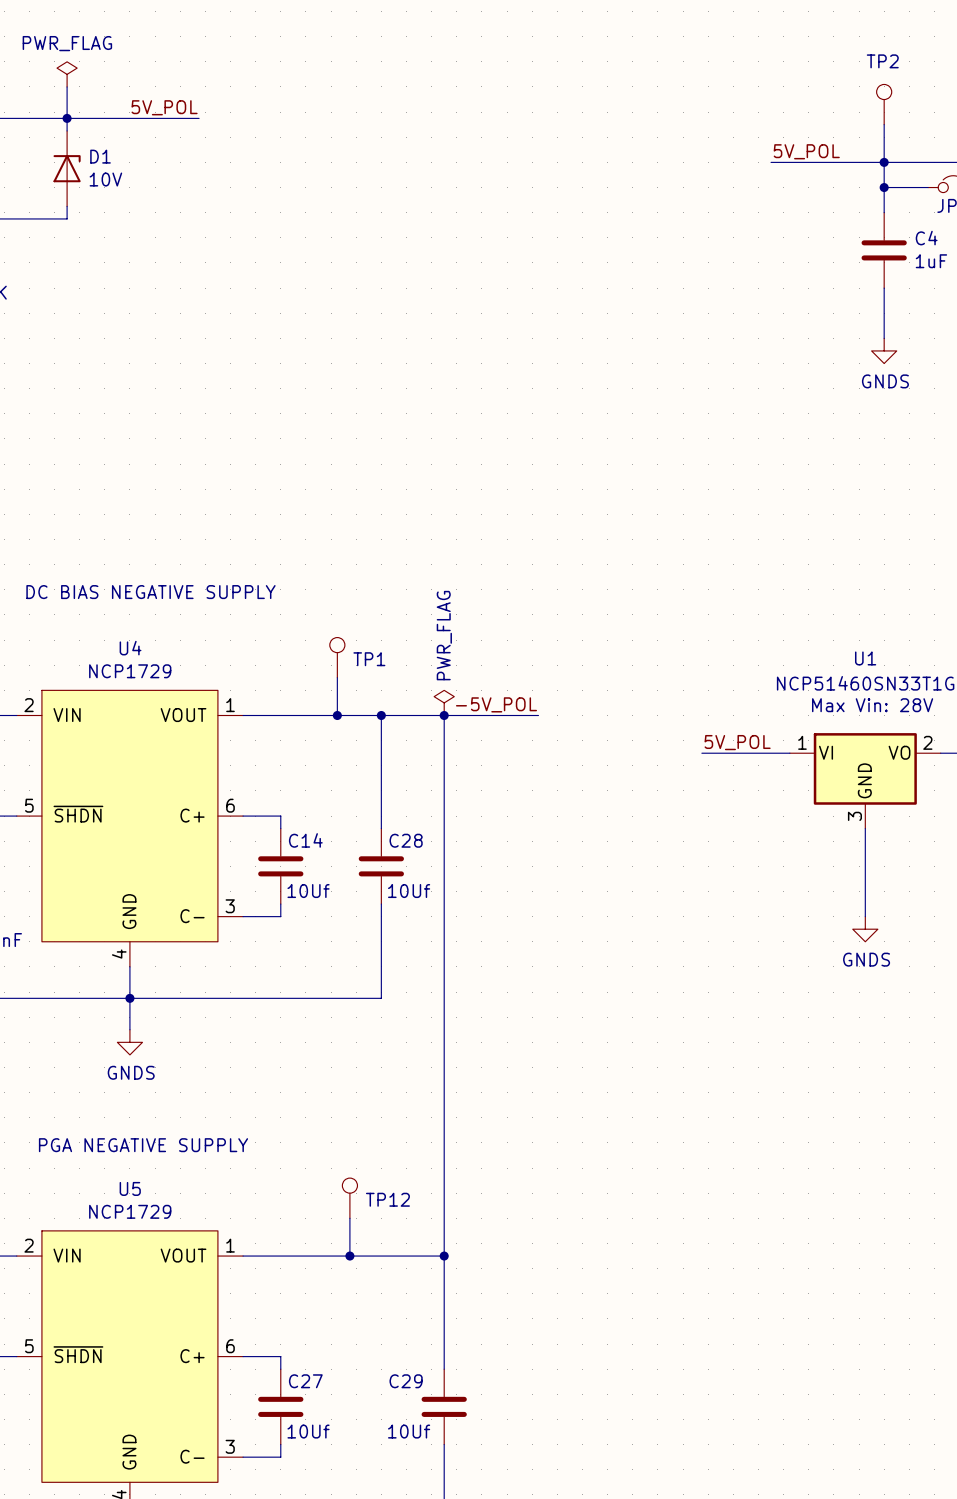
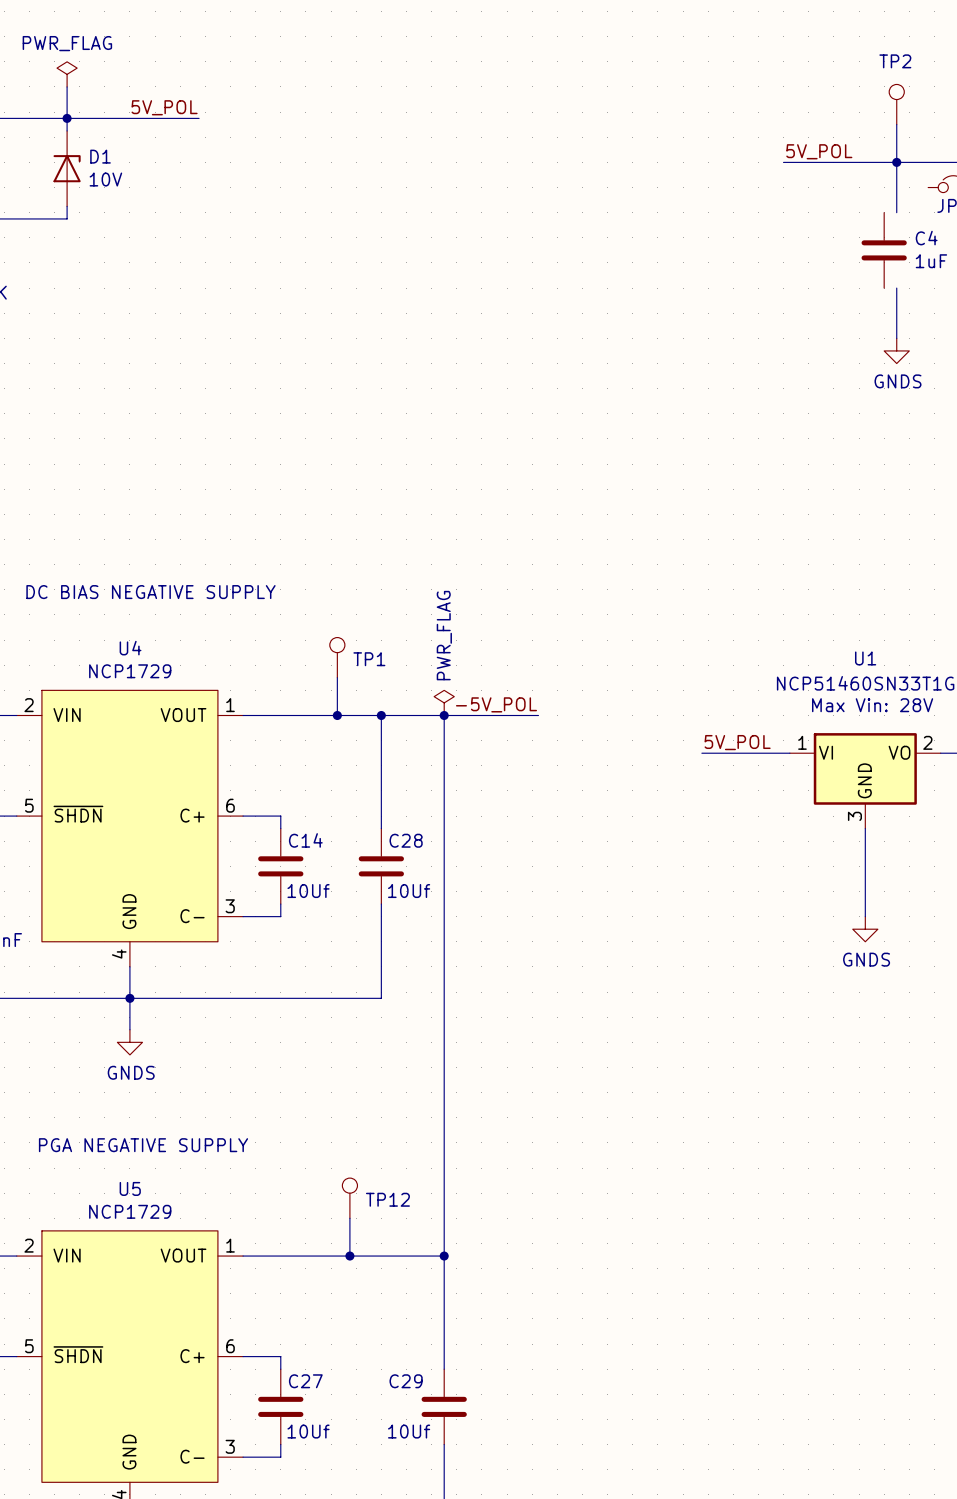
TP2 position: (884, 104) -> (896, 104)
wire: (884, 124) (884, 212) -> (896, 124) (896, 212)
label position: 5V_POL (806, 151) -> 5V_POL (819, 151)
wire: (771, 162) (783, 162) -> none
junction position: (884, 162) -> (896, 162)
wire: (884, 187) (928, 187) -> none
junction: (884, 187) -> none
wire: (884, 288) (884, 338) -> (896, 288) (896, 338)
power symbol position: GNDS (884, 350) -> GNDS (896, 350)

